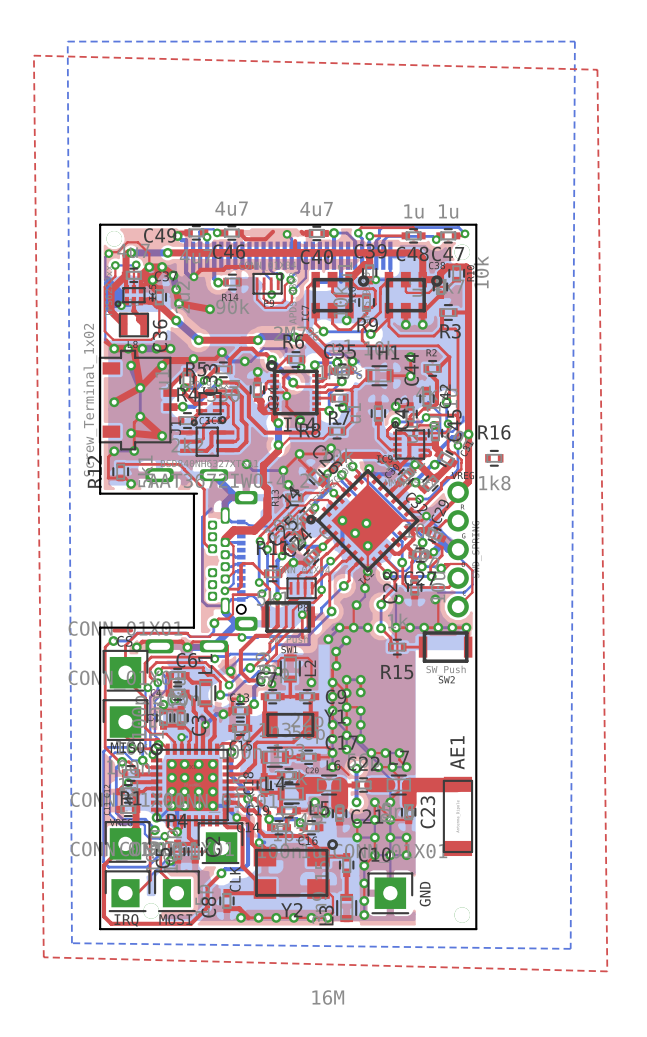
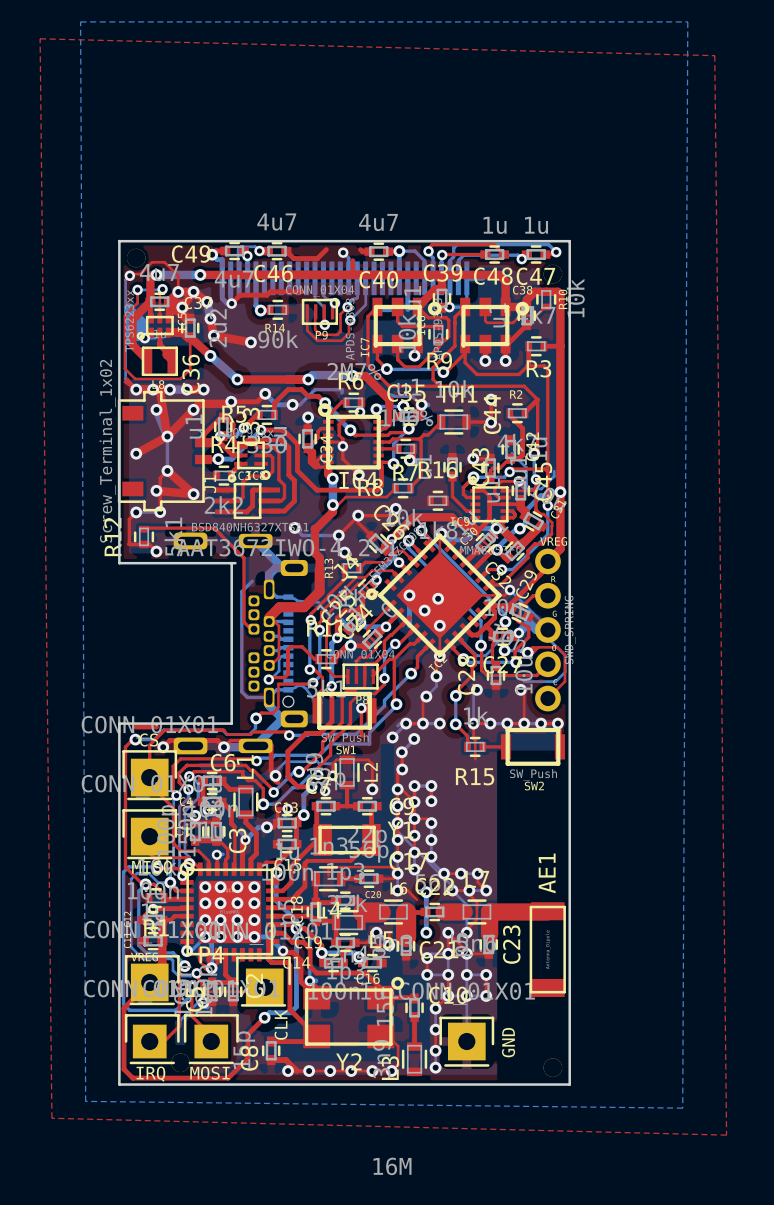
R16 position: (494, 458) -> (437, 500)

